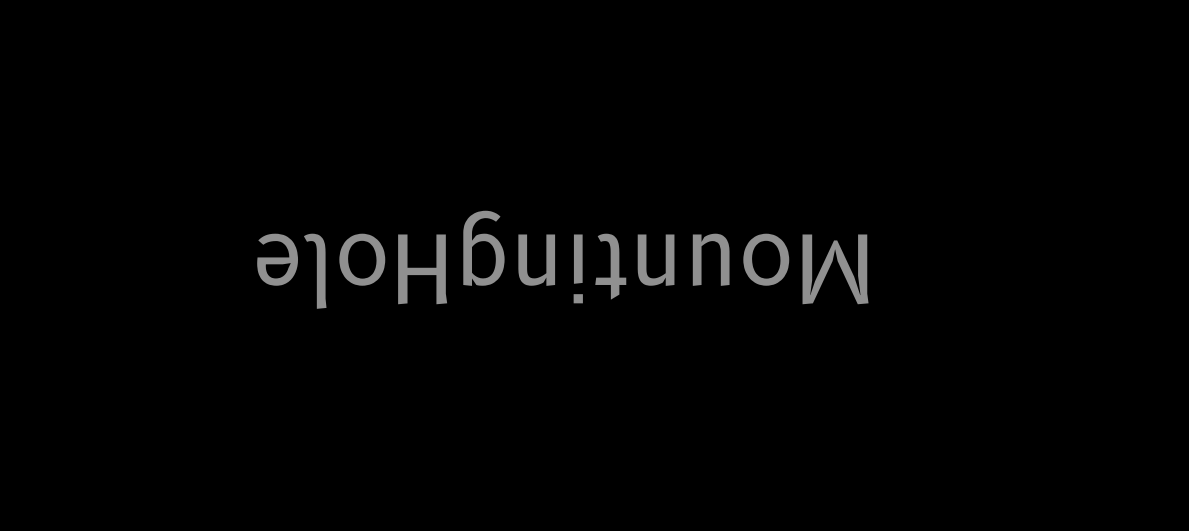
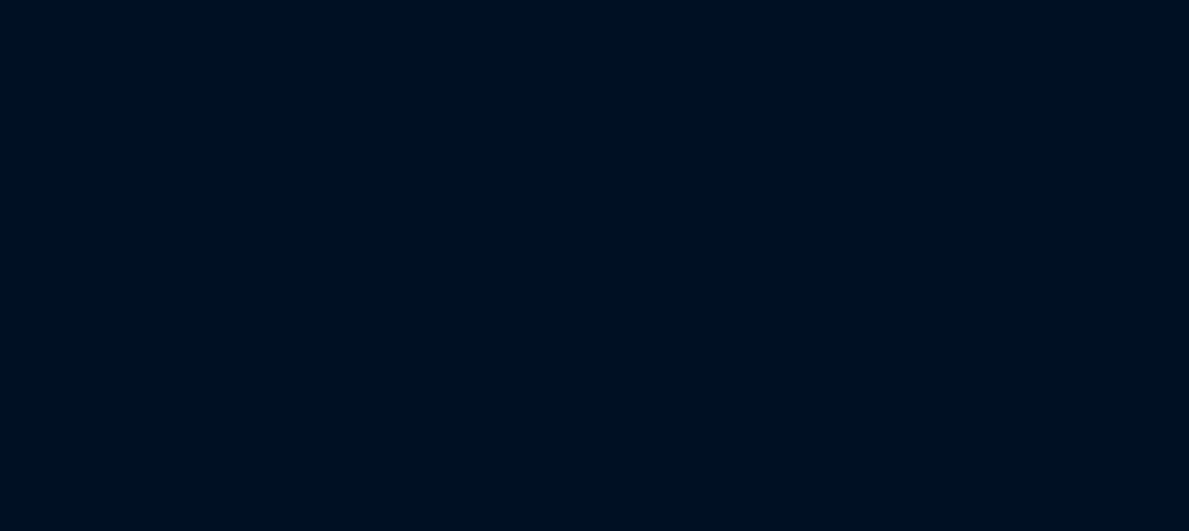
text: MountingHole (562, 259) -> none

